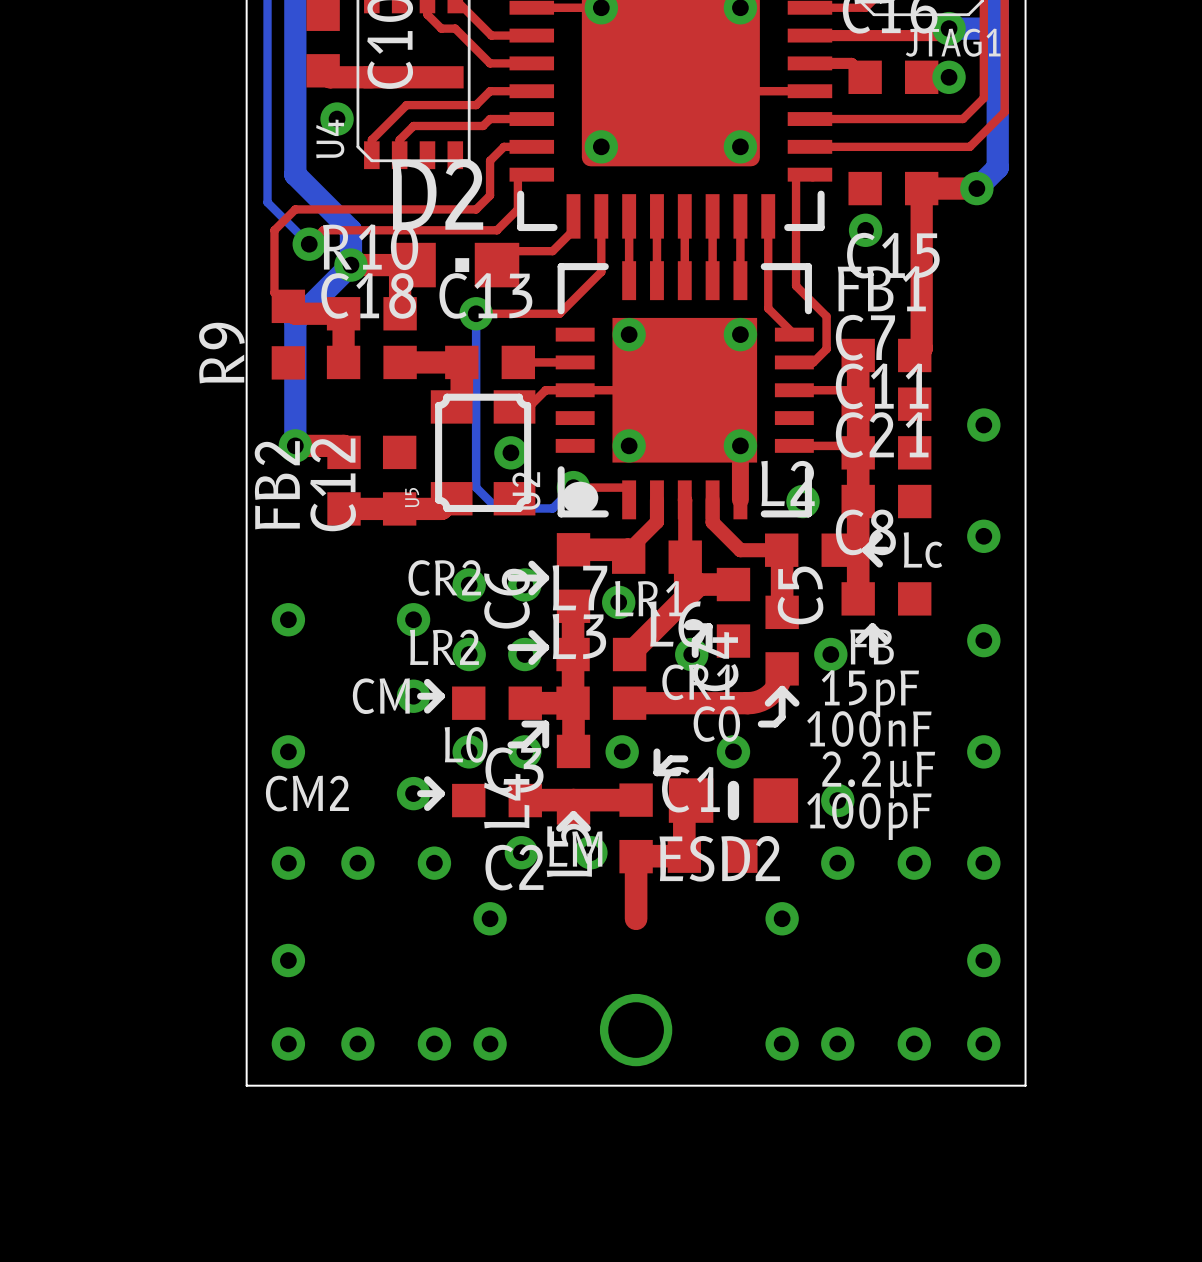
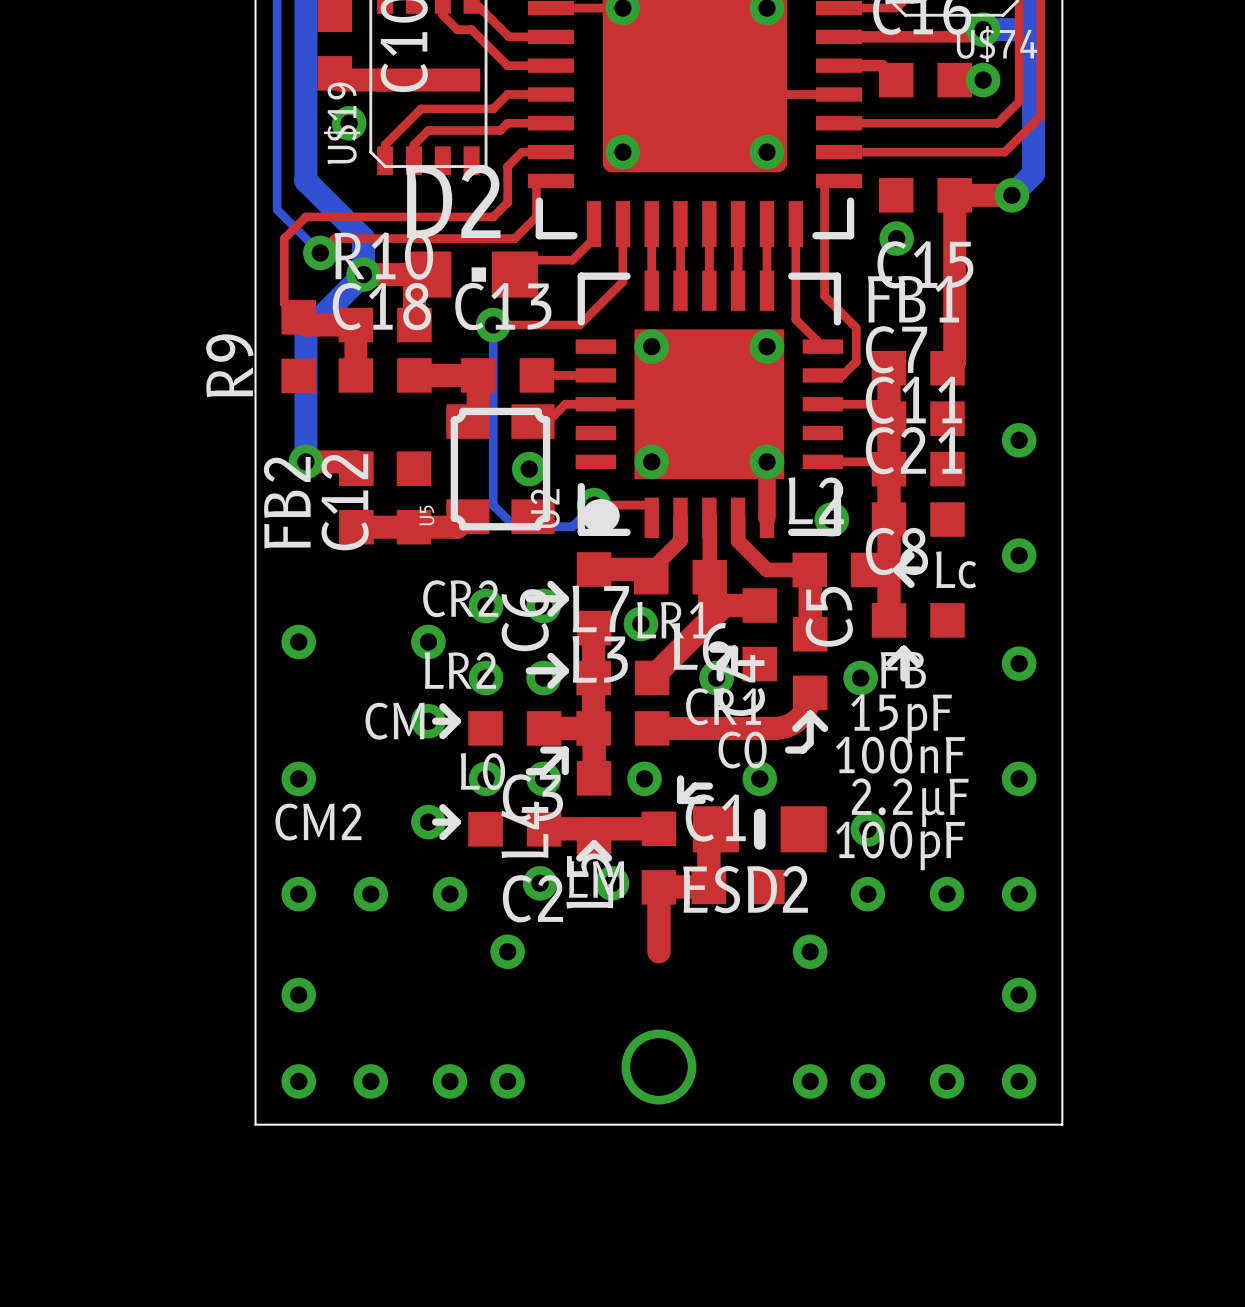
JTAG1 name: JTAG1 (953, 42) -> U$74 (996, 44)
U4 name: U4 (330, 138) -> U$19 (341, 123)

